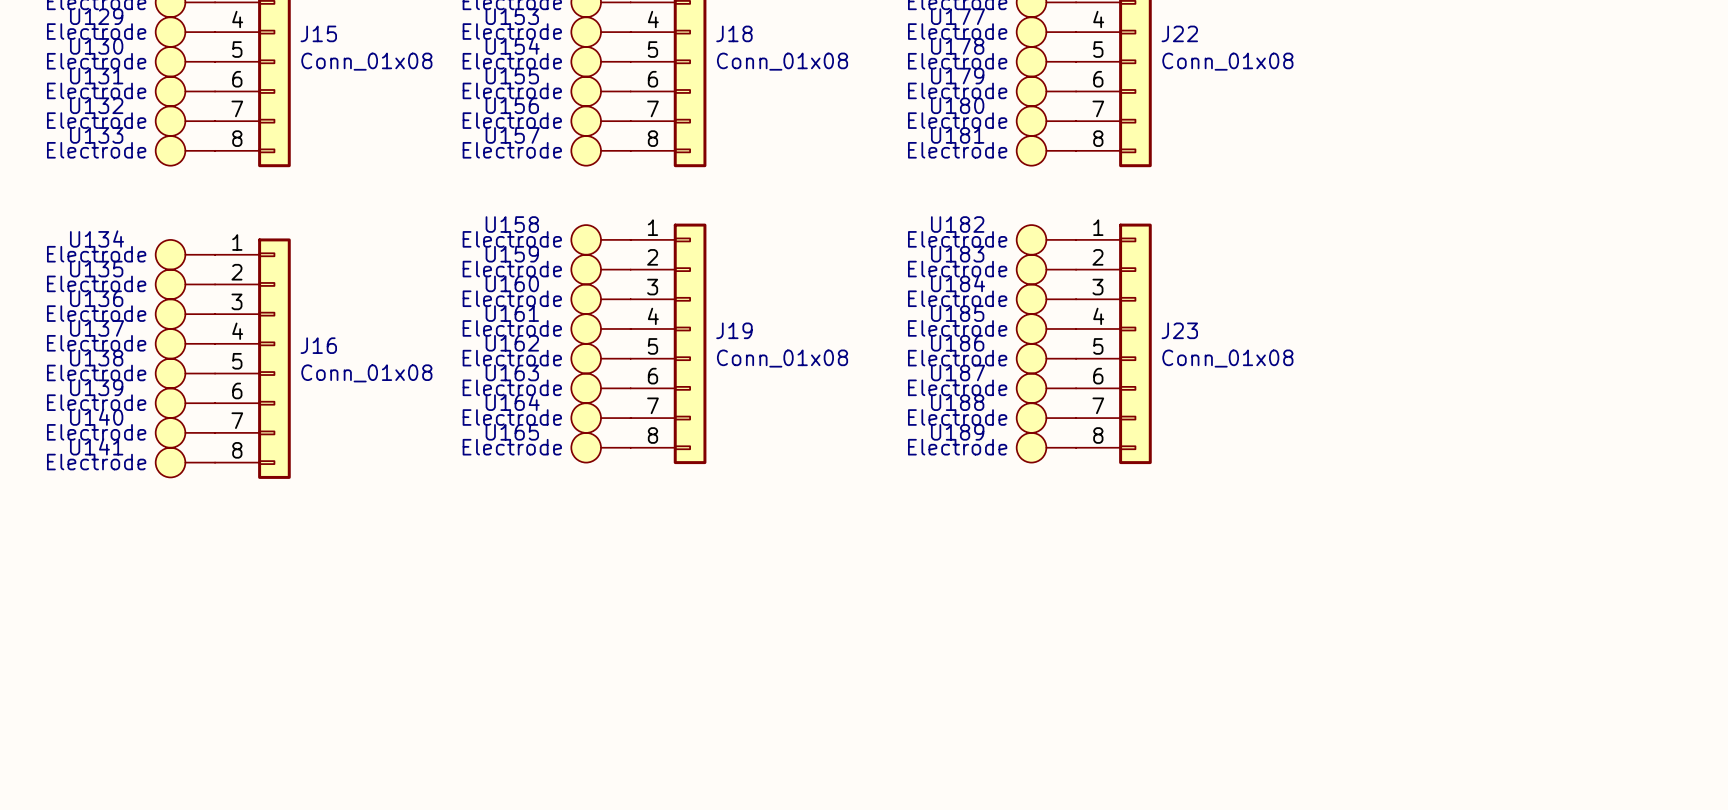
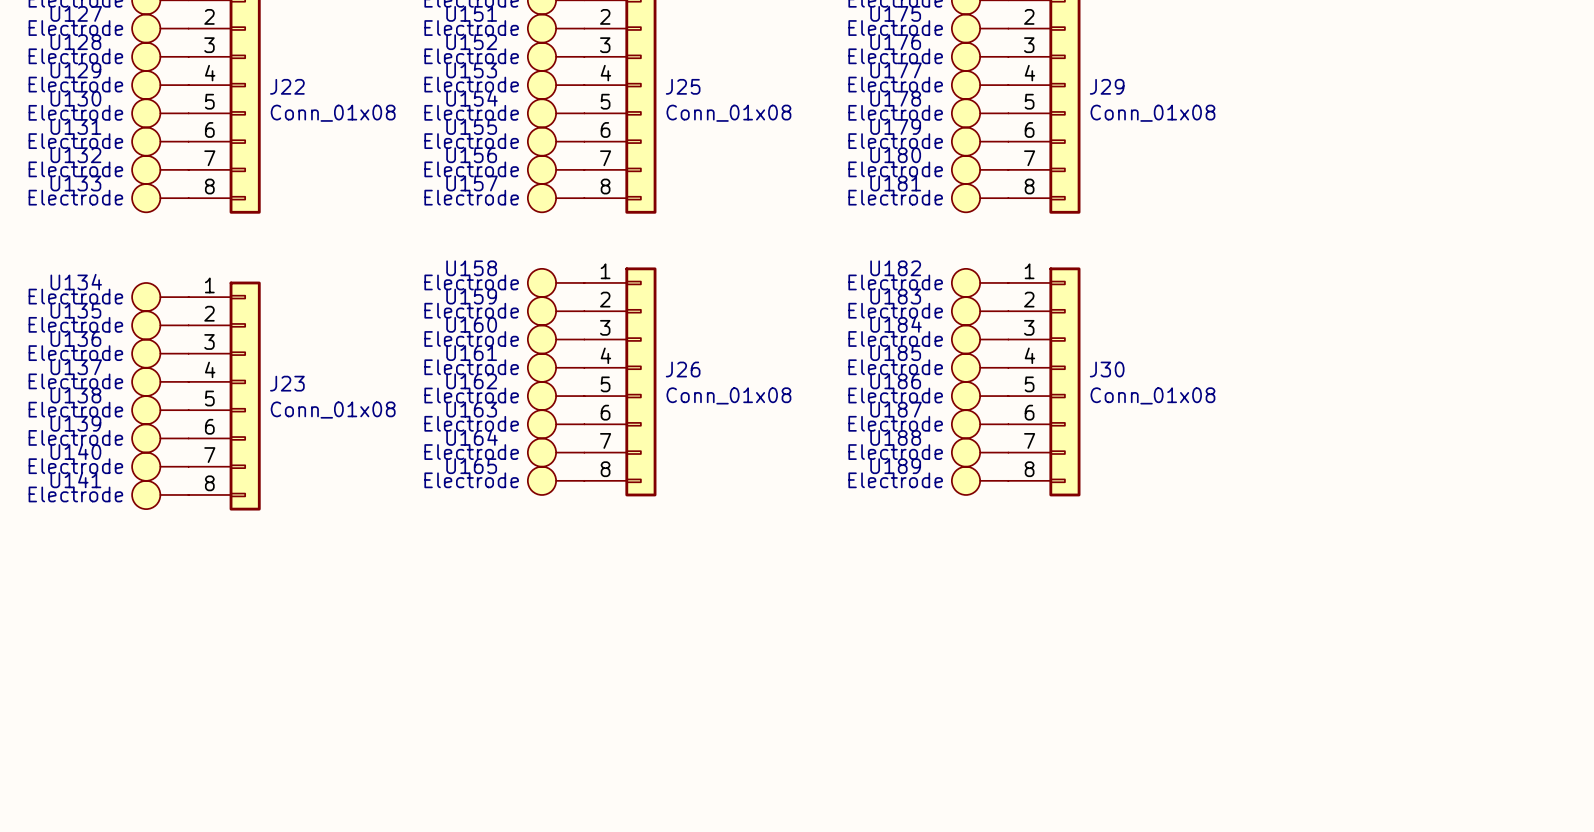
J15 name: J15 (318, 33) -> J22 (287, 86)
J18 name: J18 (734, 33) -> J25 (683, 86)
J22 name: J22 (1179, 33) -> J29 (1107, 86)
J19 name: J19 (734, 330) -> J26 (683, 369)
J23 name: J23 (1179, 330) -> J30 (1107, 369)
J16 name: J16 (318, 345) -> J23 (287, 383)

